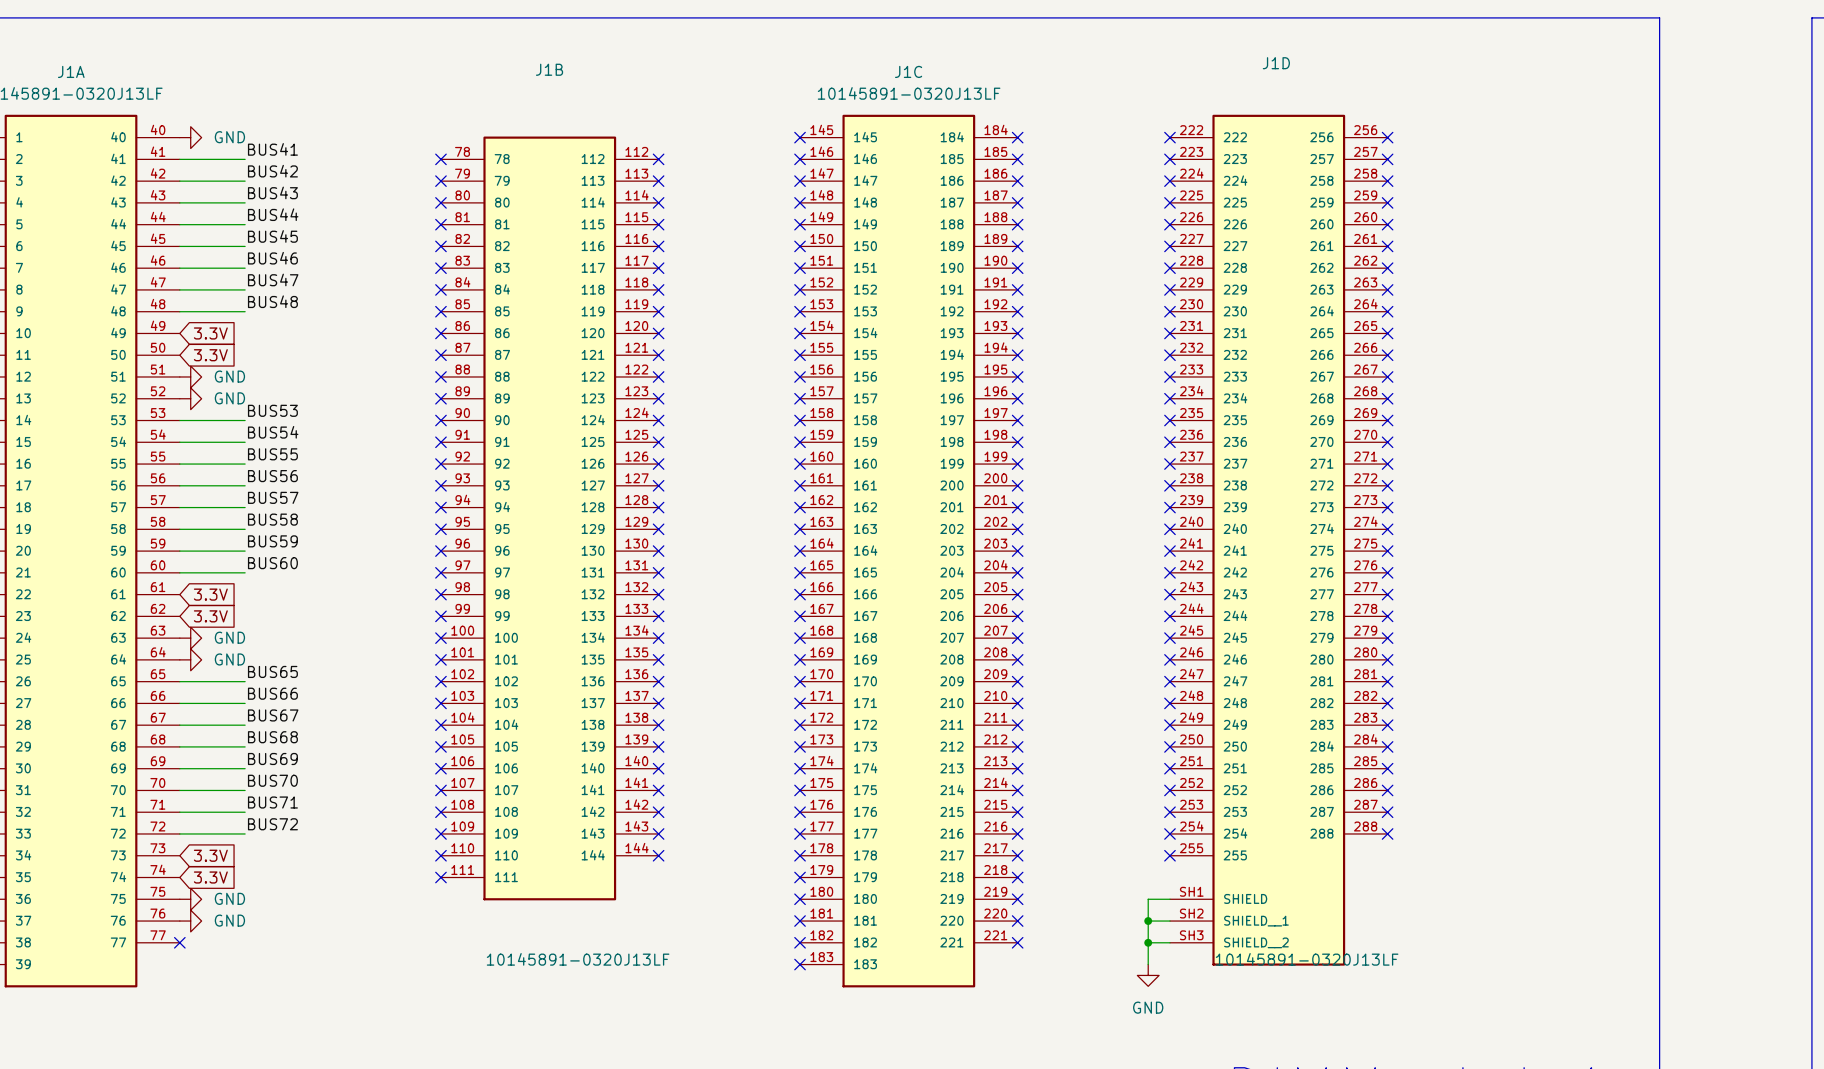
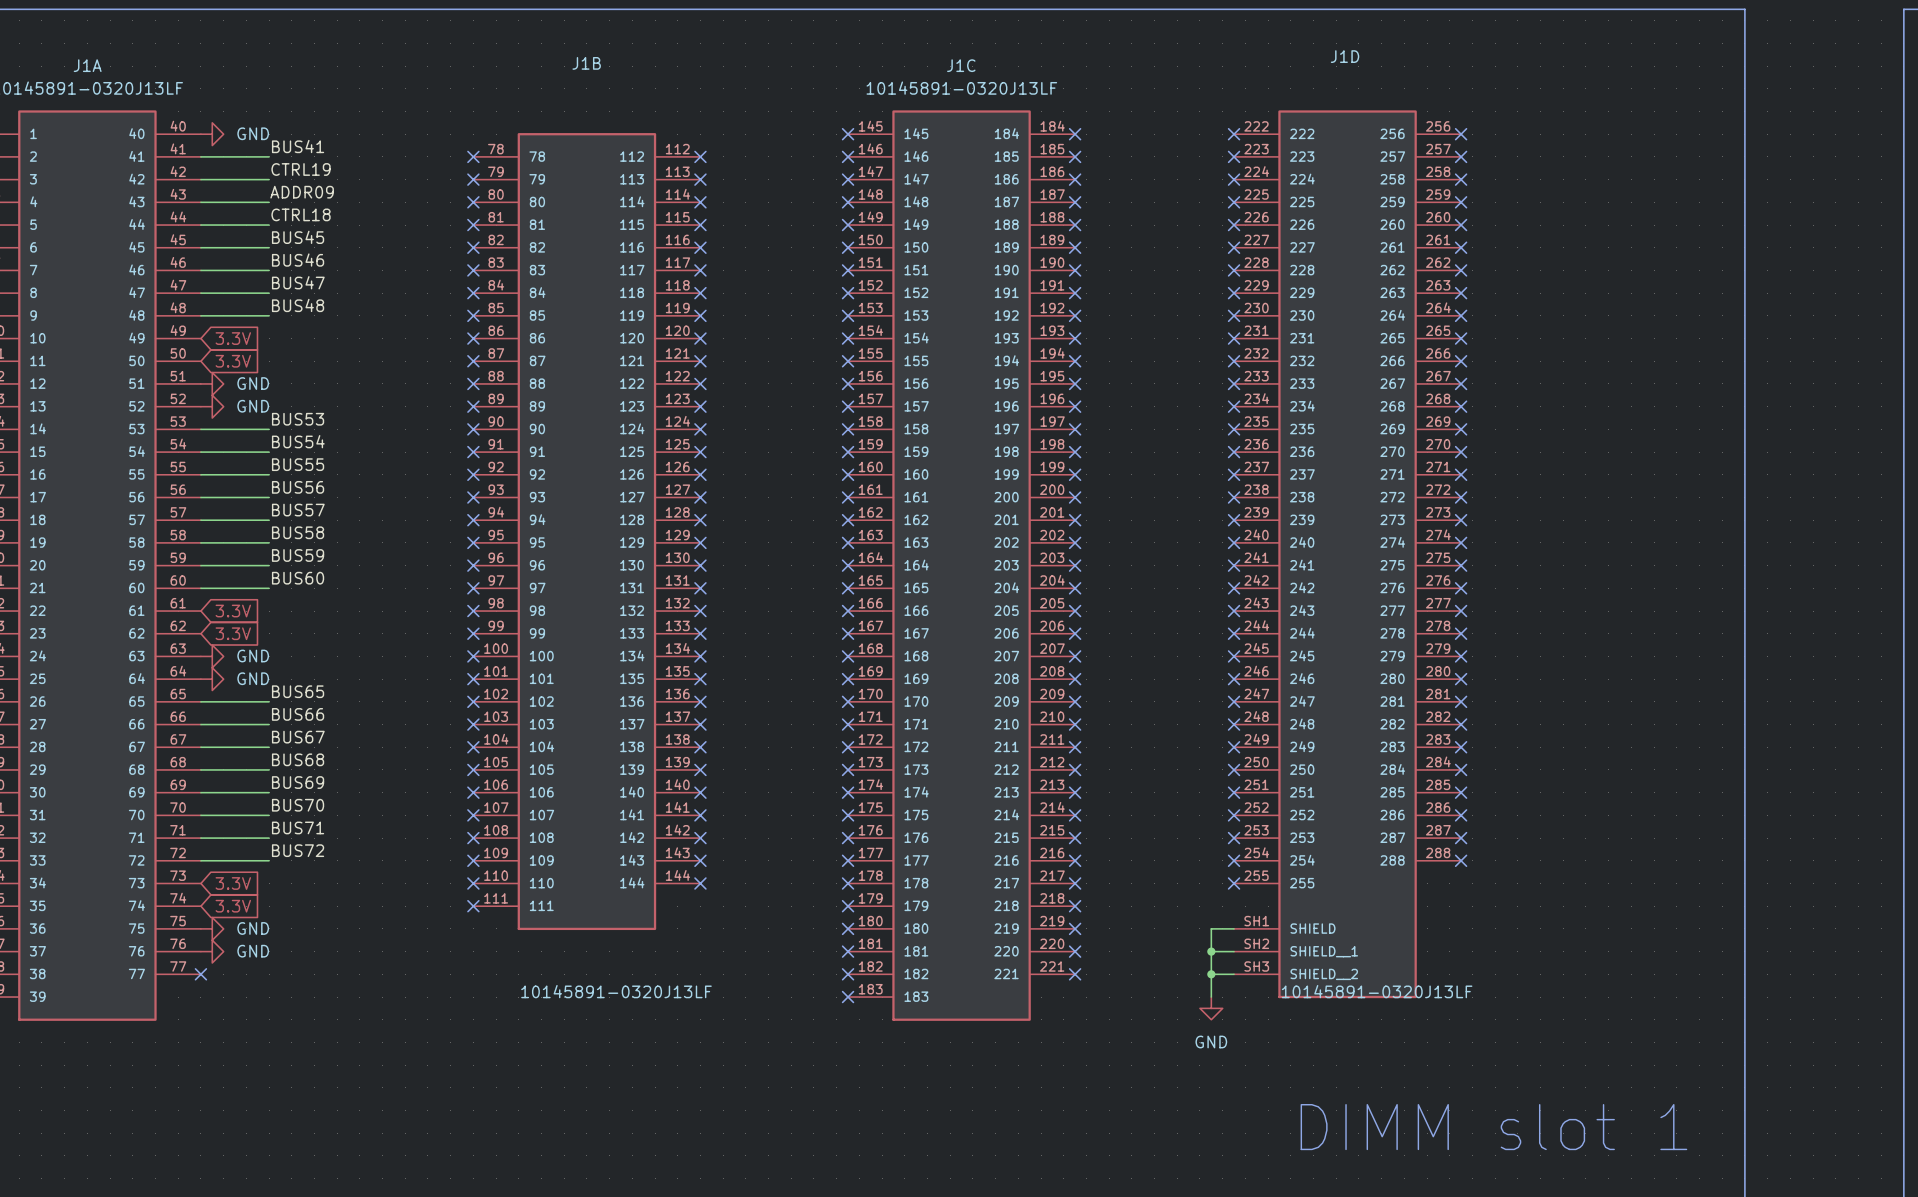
label: BUS42 (272, 171) -> CTRL19 (301, 169)
label: BUS43 (272, 192) -> ADDR09 (302, 192)
label: BUS44 (273, 214) -> CTRL18 (301, 214)

